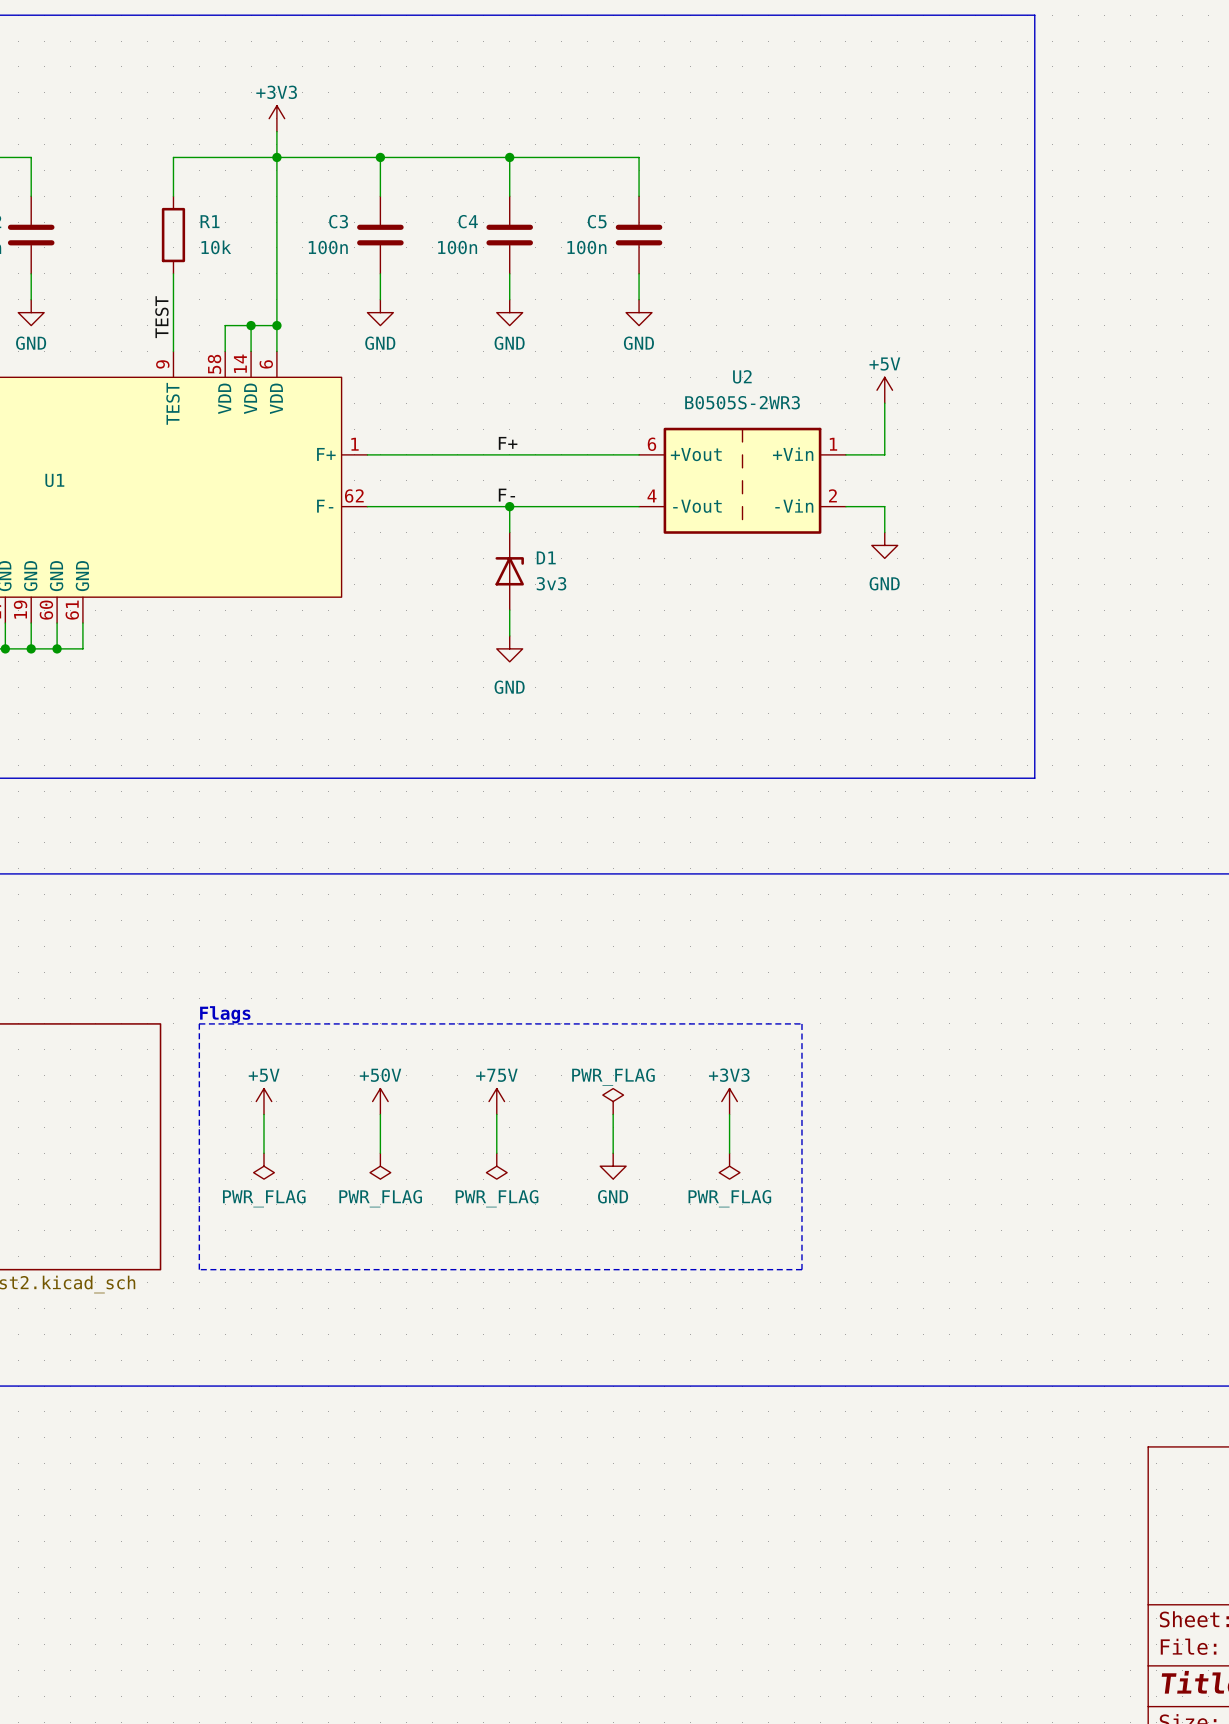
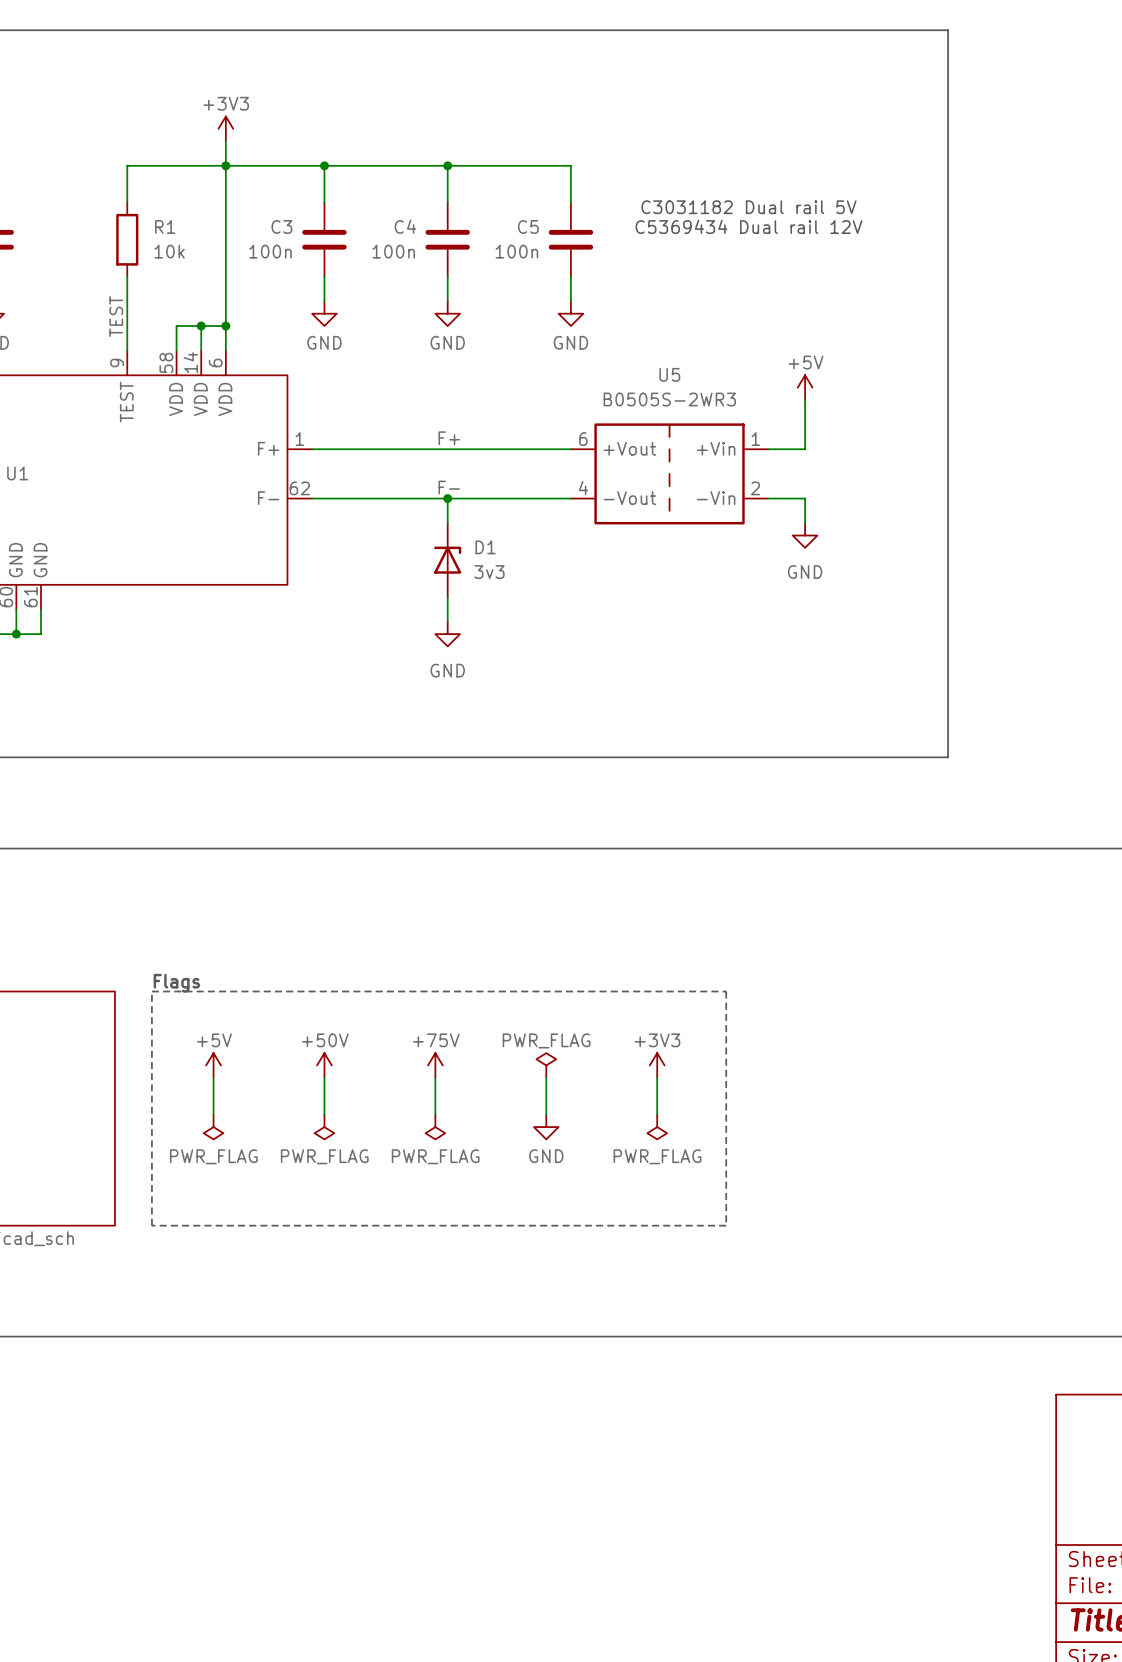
text: none -> C3031182 Dual rail 5V (748, 207)
text: none -> C5369434 Dual rail 12V (748, 226)
U2 name: U2 (742, 376) -> U5 (669, 374)

